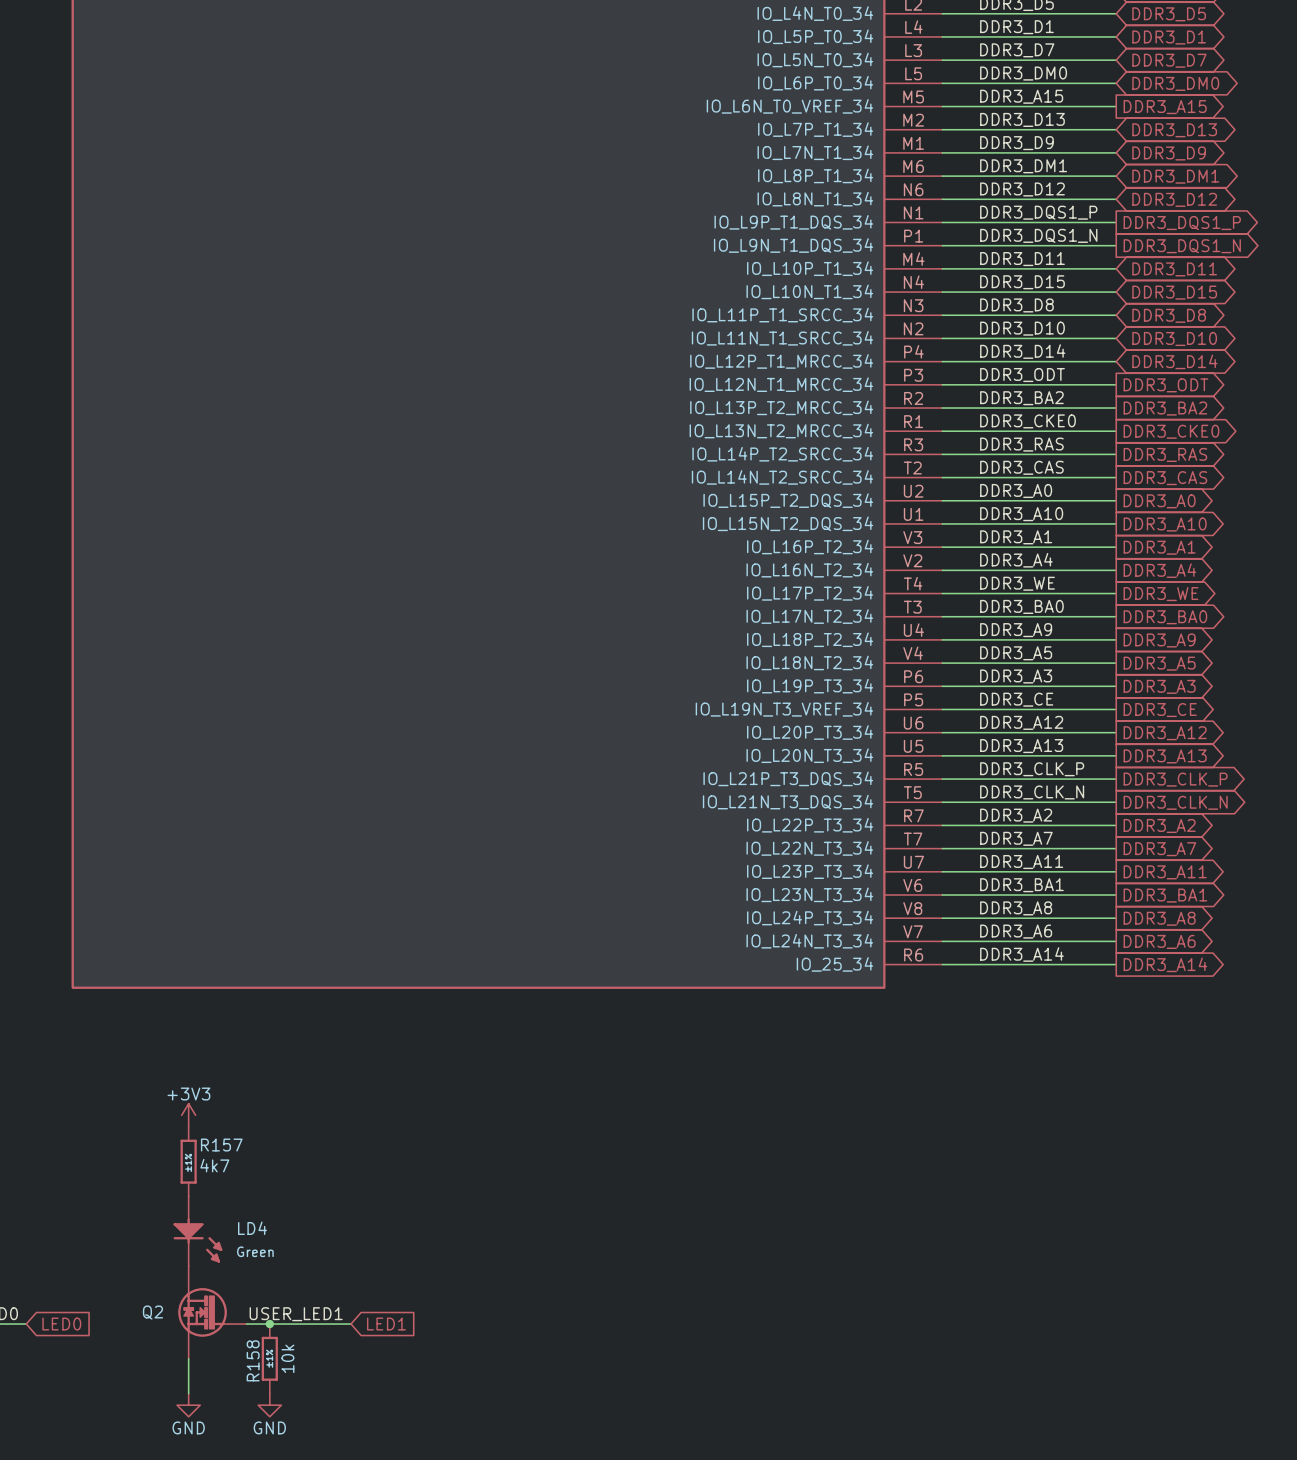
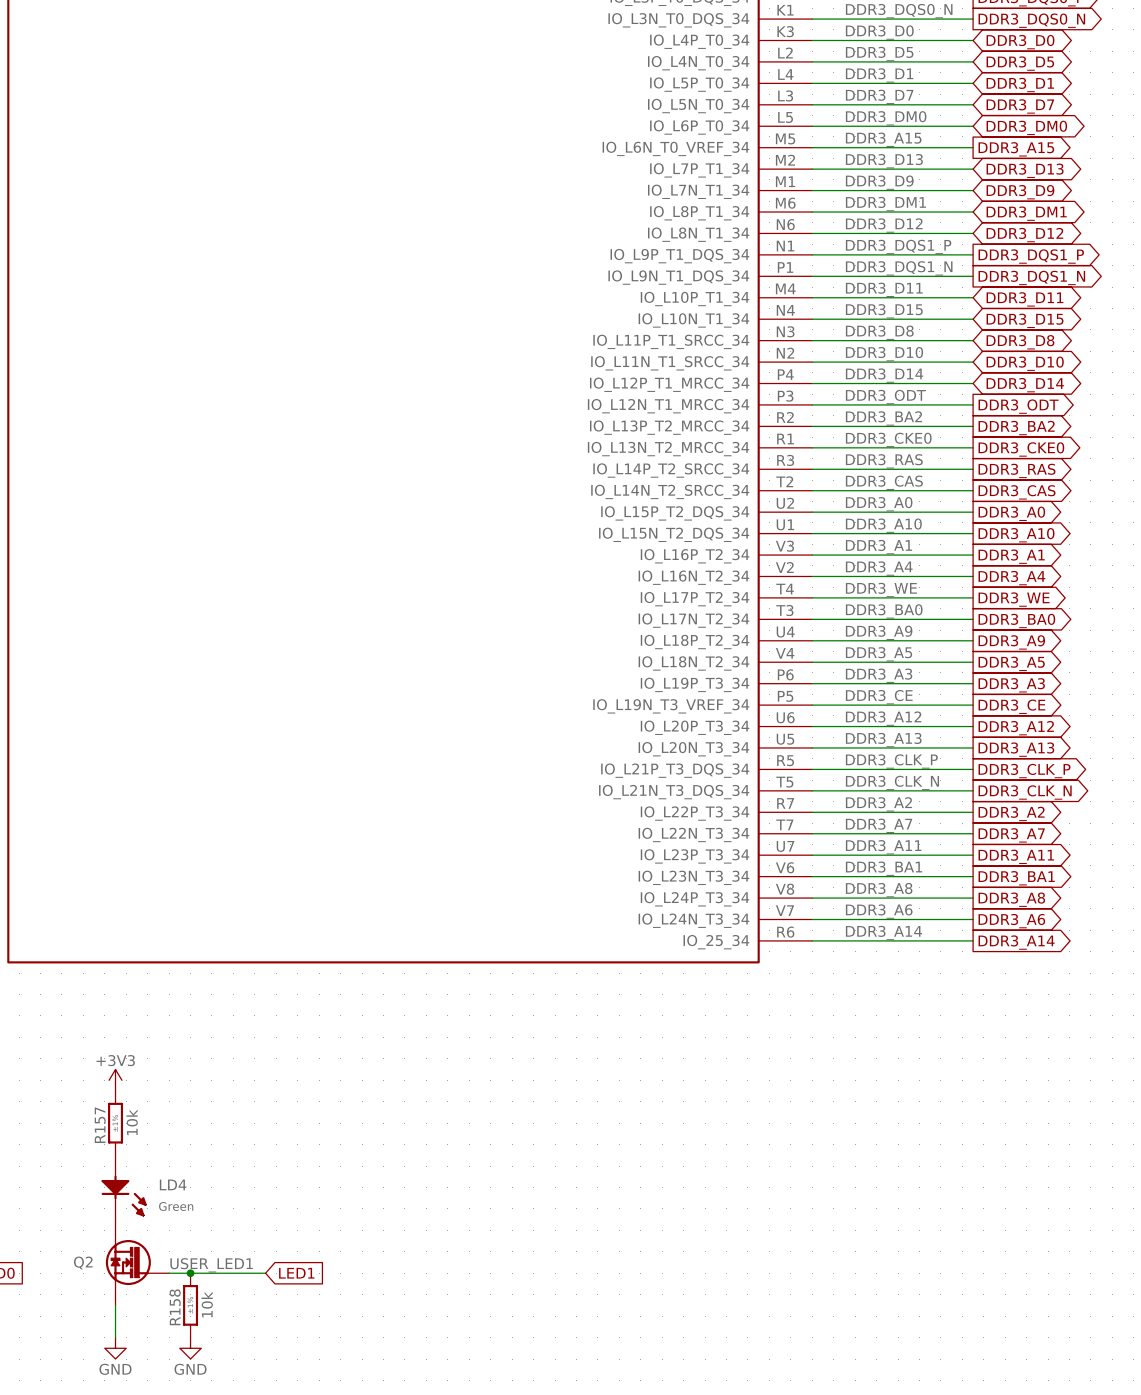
R157 name rotation: 0° (221, 1145) -> 90° counterclockwise (100, 1125)
R157 name position: R157 (221, 1145) -> R157 (100, 1125)
R157 text: 4k7 (214, 1165) -> 10k (132, 1122)

